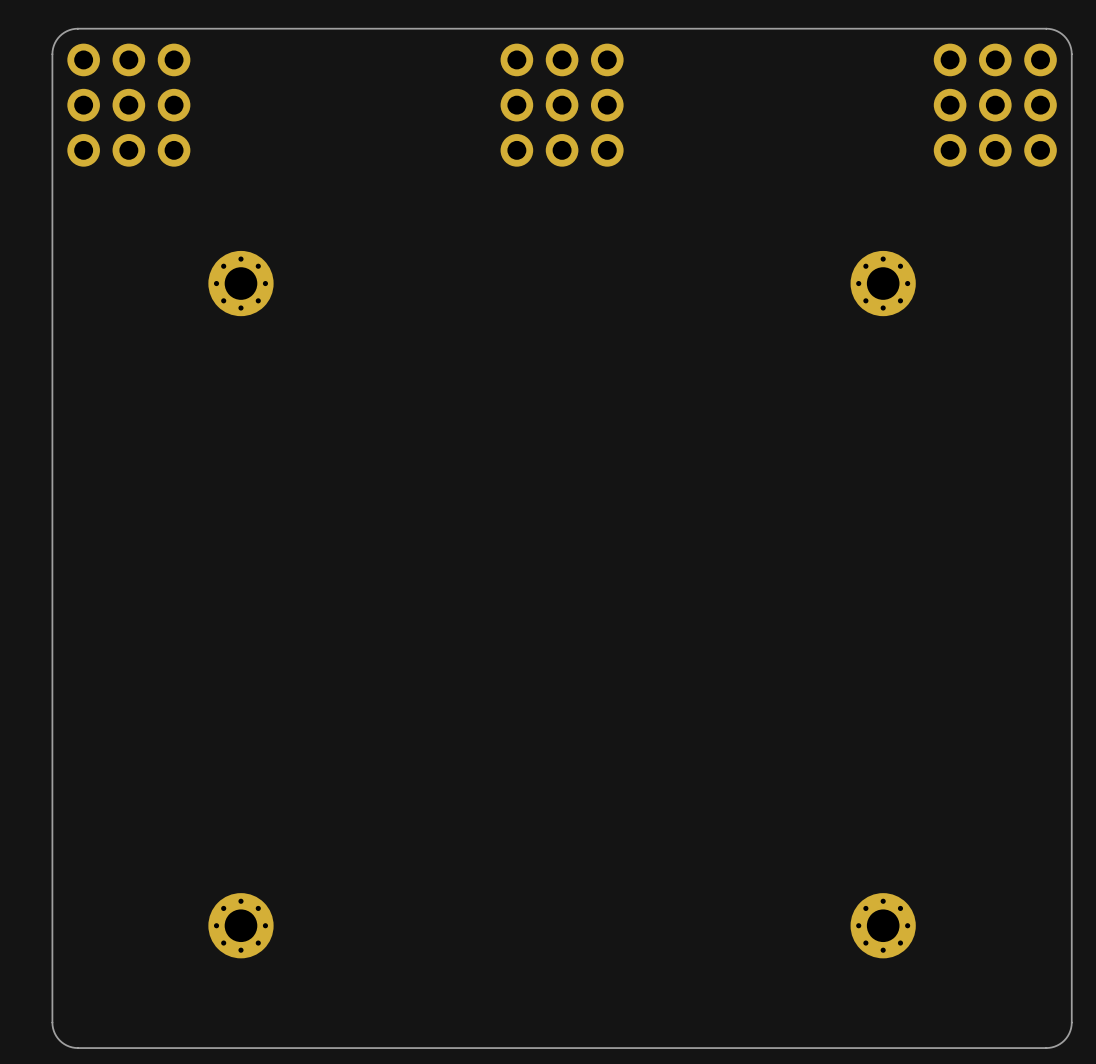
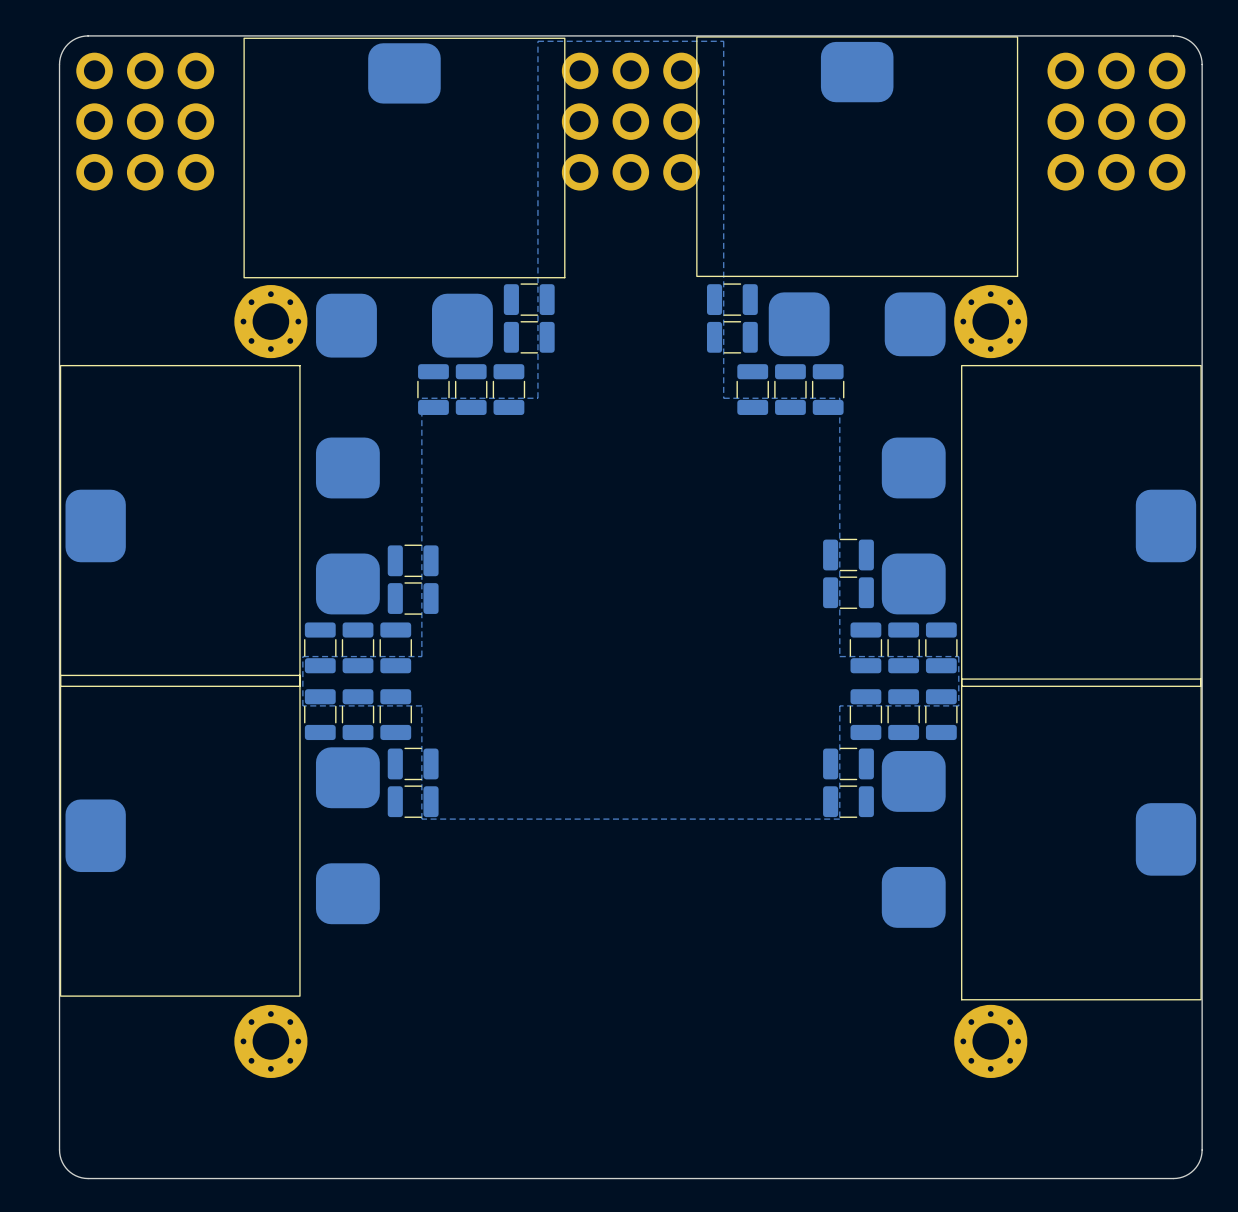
zone outline: none -> (723, 41) (723, 398) (839, 398) (839, 656) (958, 656) (958, 705) (839, 705) (839, 819) (421, 819) (421, 705) (302, 705) (302, 656) (421, 656) (421, 398) (537, 398) (537, 41) (723, 41)
part: none -> (857, 196)
part: none -> (404, 197)
part: none -> (529, 299)
part: none -> (732, 299)
part: none -> (529, 337)
part: none -> (732, 337)
part: none -> (433, 389)
part: none -> (471, 389)
part: none -> (508, 389)
part: none -> (752, 389)
part: none -> (790, 389)
part: none -> (828, 389)
part: none -> (219, 525)
part: none -> (1041, 525)
part: none -> (848, 554)
part: none -> (413, 560)
part: none -> (848, 592)
part: none -> (413, 598)
part: none -> (320, 647)
part: none -> (358, 647)
part: none -> (395, 647)
part: none -> (865, 647)
part: none -> (903, 647)
part: none -> (941, 647)
part: none -> (320, 714)
part: none -> (358, 714)
part: none -> (395, 714)
part: none -> (865, 714)
part: none -> (903, 714)
part: none -> (941, 714)
part: none -> (413, 763)
part: none -> (848, 763)
part: none -> (413, 801)
part: none -> (848, 801)
part: none -> (219, 835)
part: none -> (1041, 839)

